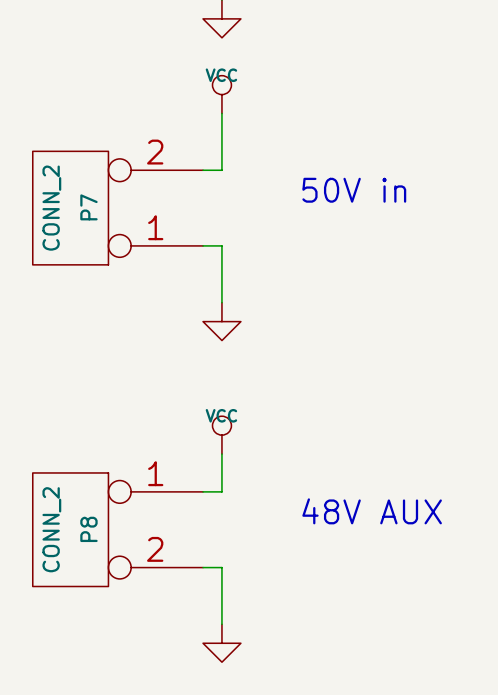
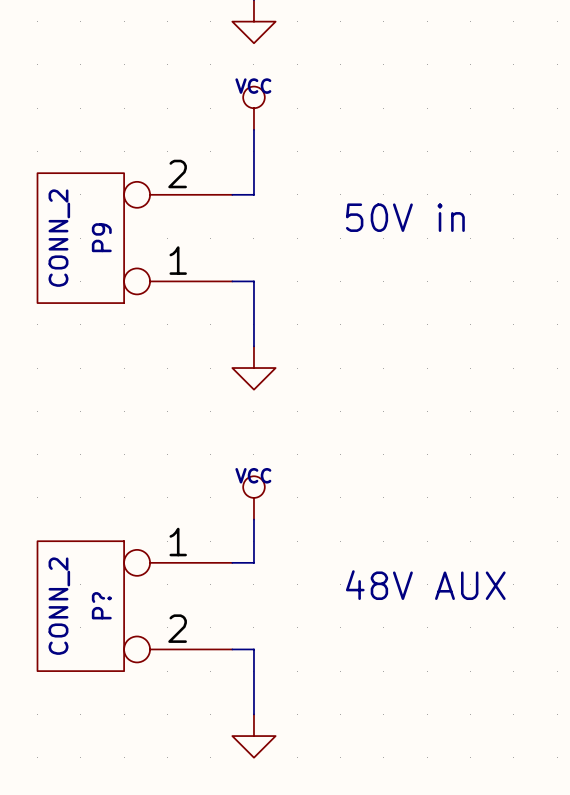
P7 name: P7 (88, 207) -> P9 (101, 237)
P8 name: P8 (88, 529) -> P? (101, 605)

